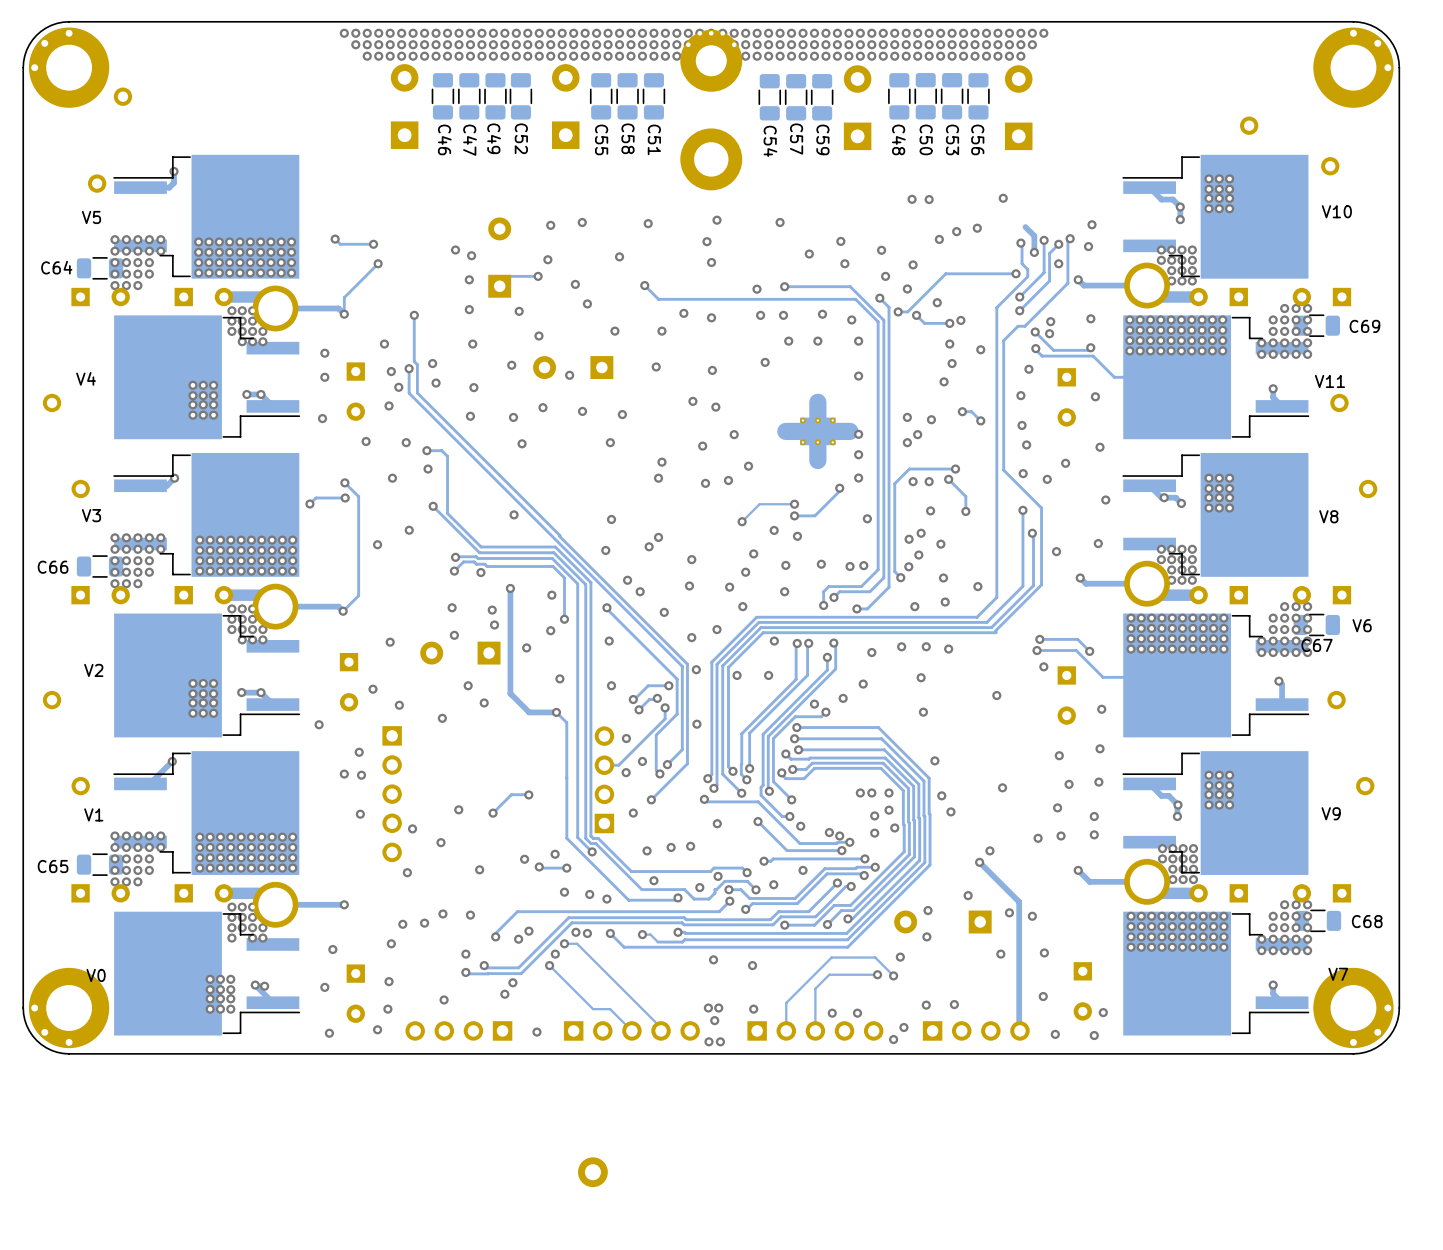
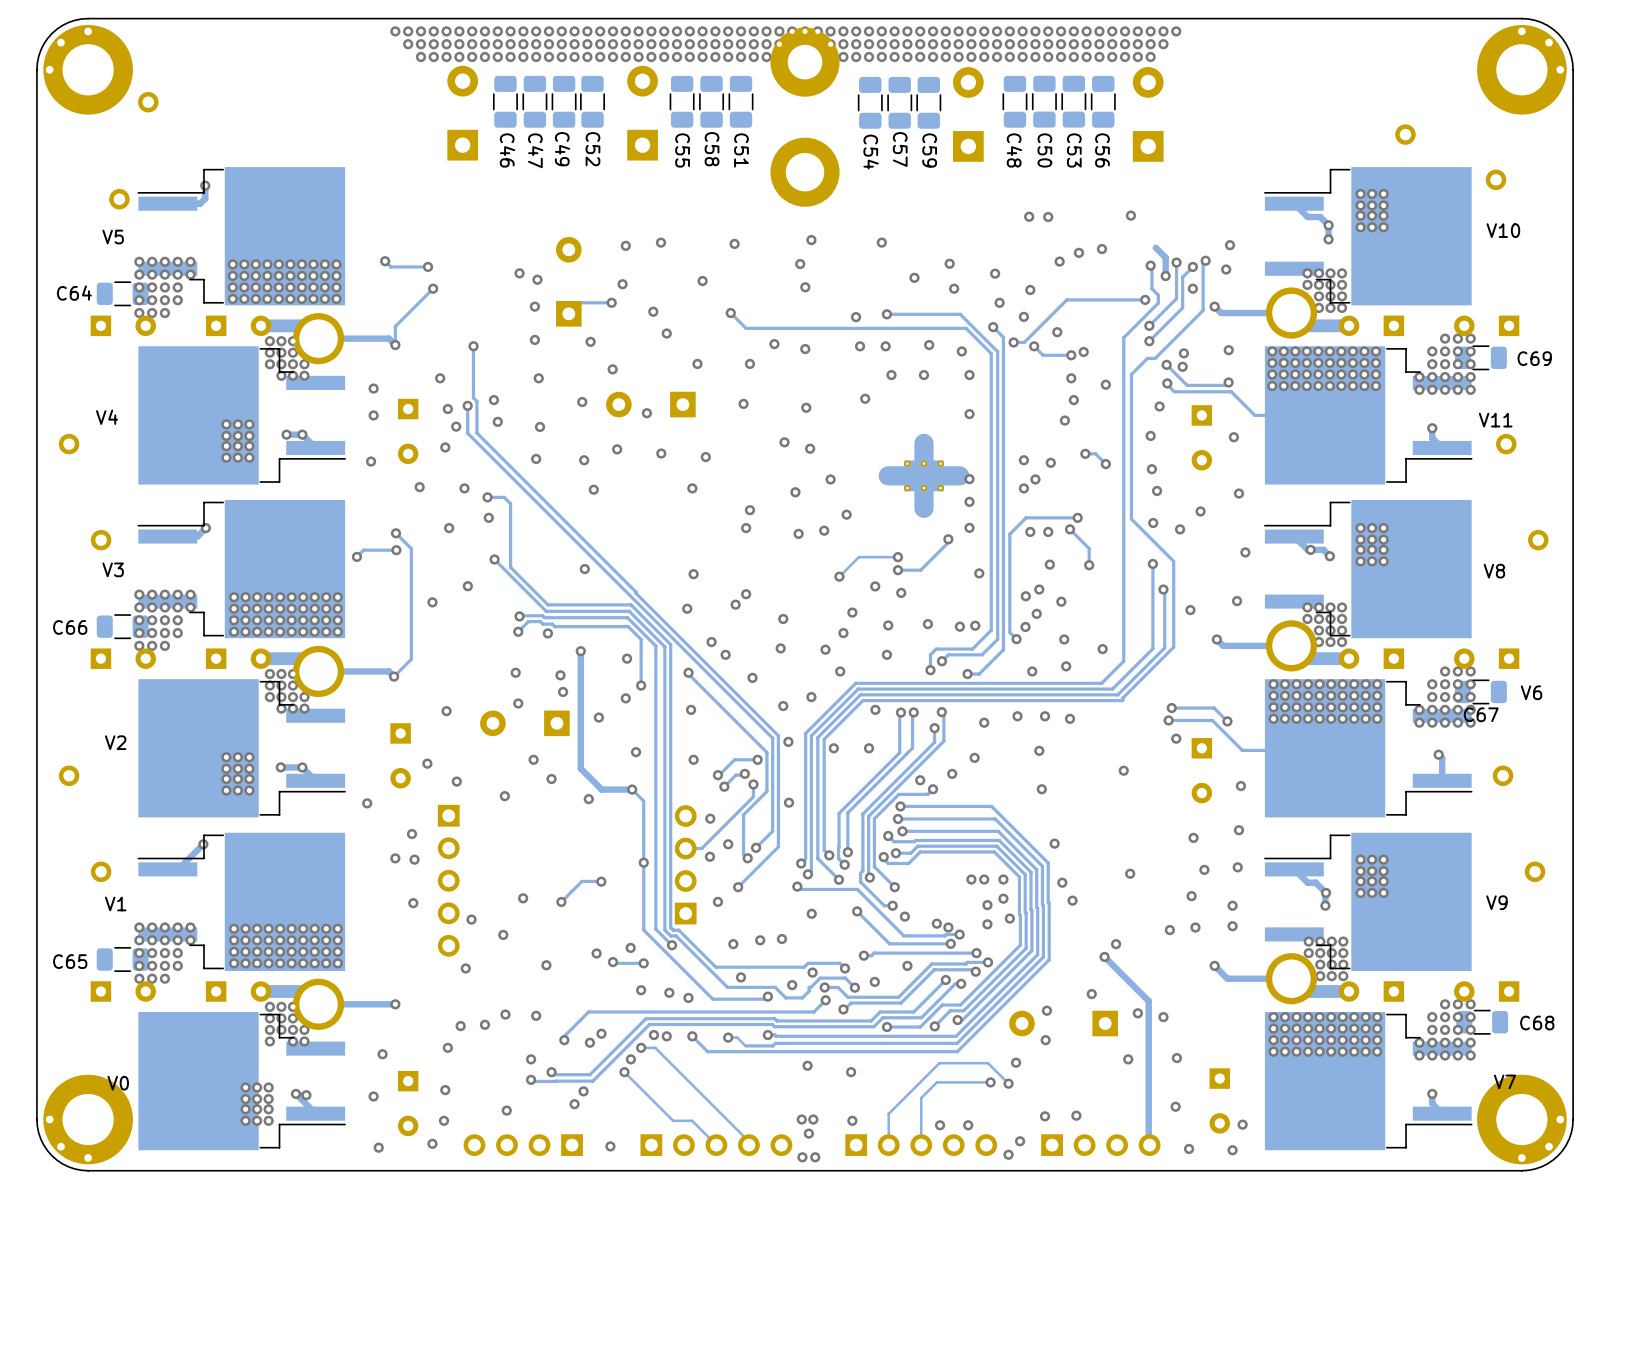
via: none -> (588, 799)
via: none -> (643, 862)
part: (592, 1172) -> none

